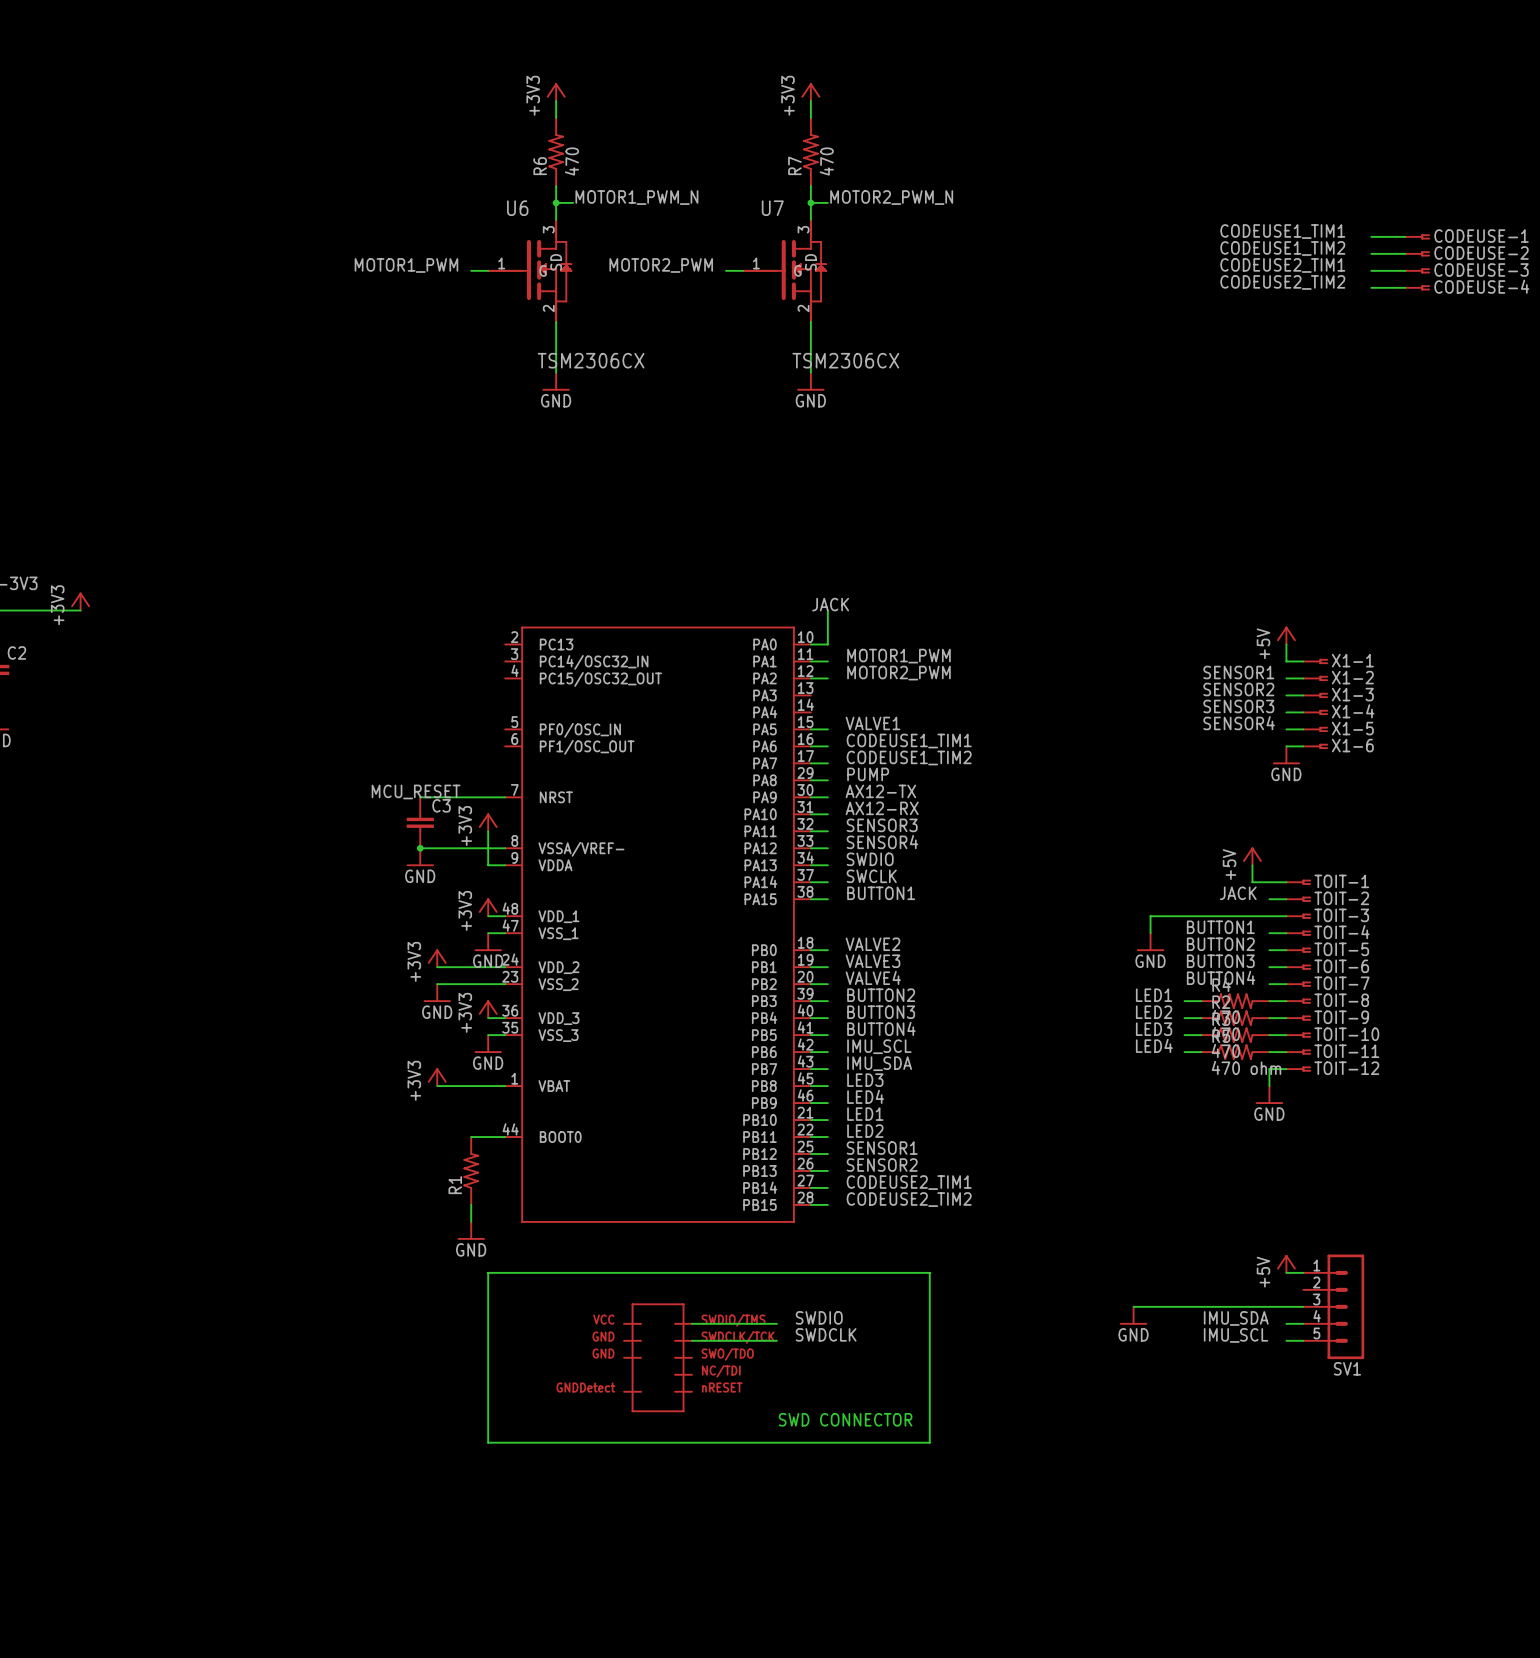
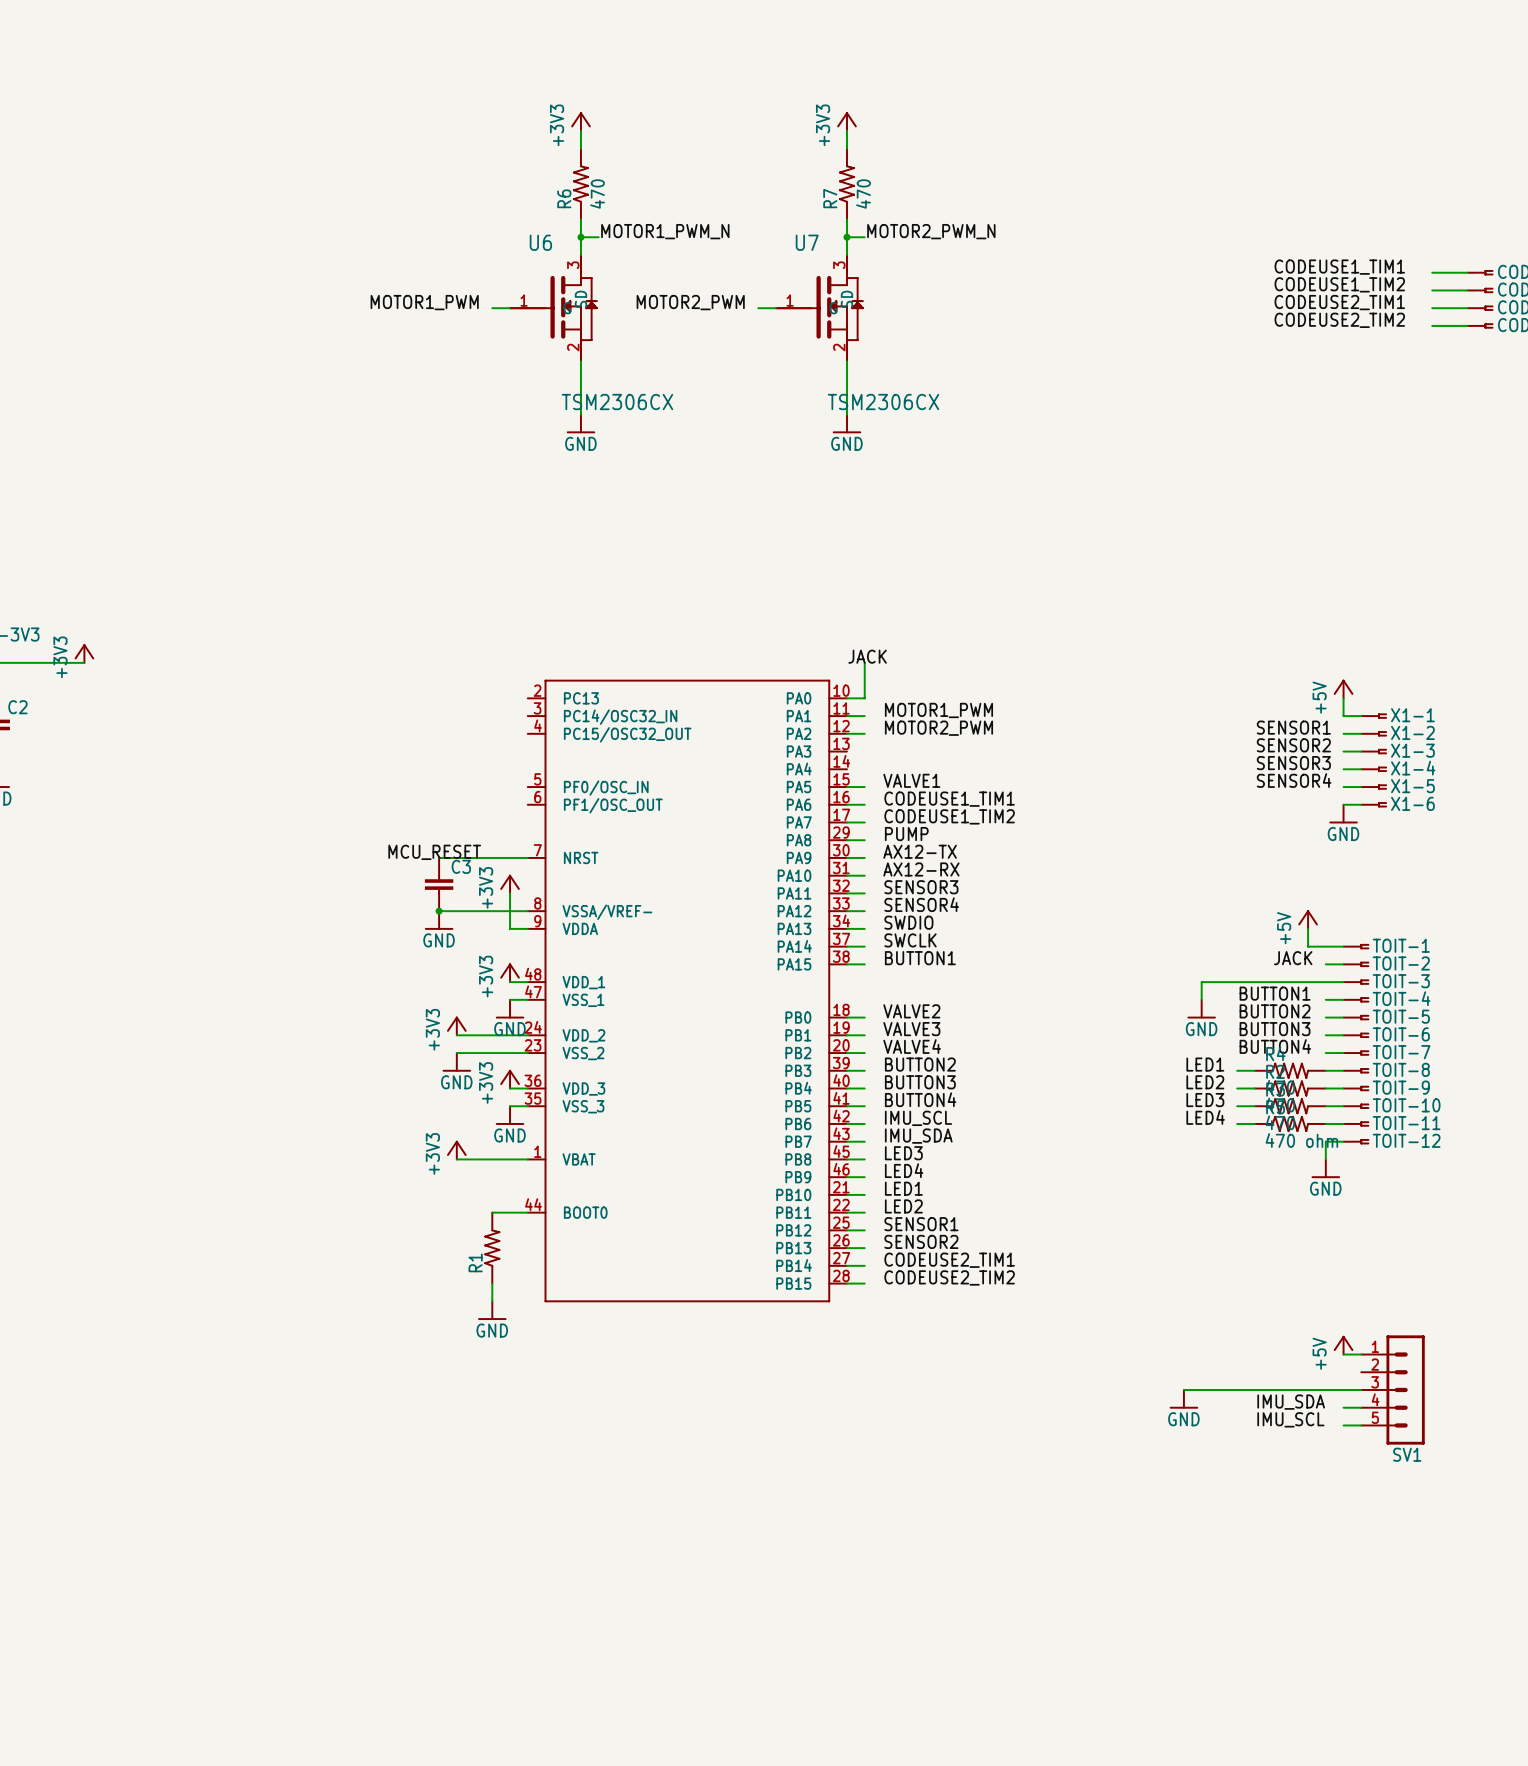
wire: (488, 1272) (488, 1442) (929, 1442) (929, 1272) (488, 1272) -> none
label: SWDIO (819, 1317) -> none
wire: (692, 1323) (776, 1323) -> none
label: SWDCLK (826, 1334) -> none
wire: (692, 1340) (776, 1340) -> none
part: (658, 1357) -> none
text: SWD CONNECTOR (845, 1419) -> none

